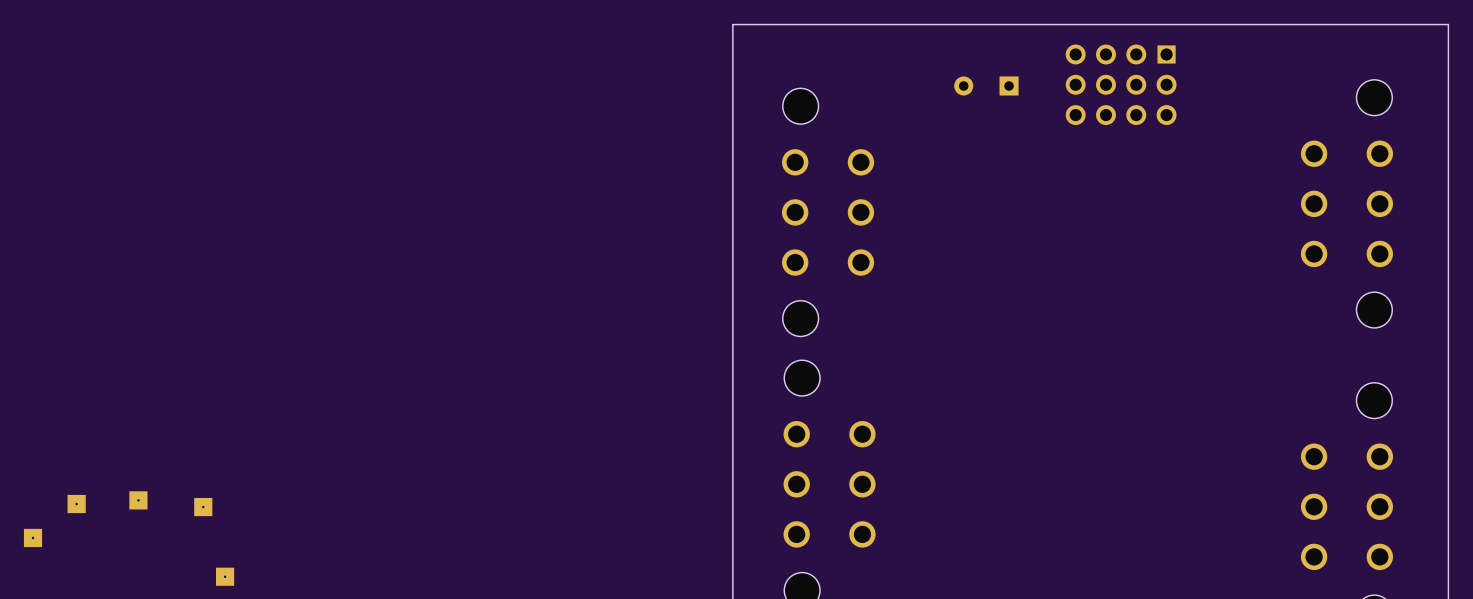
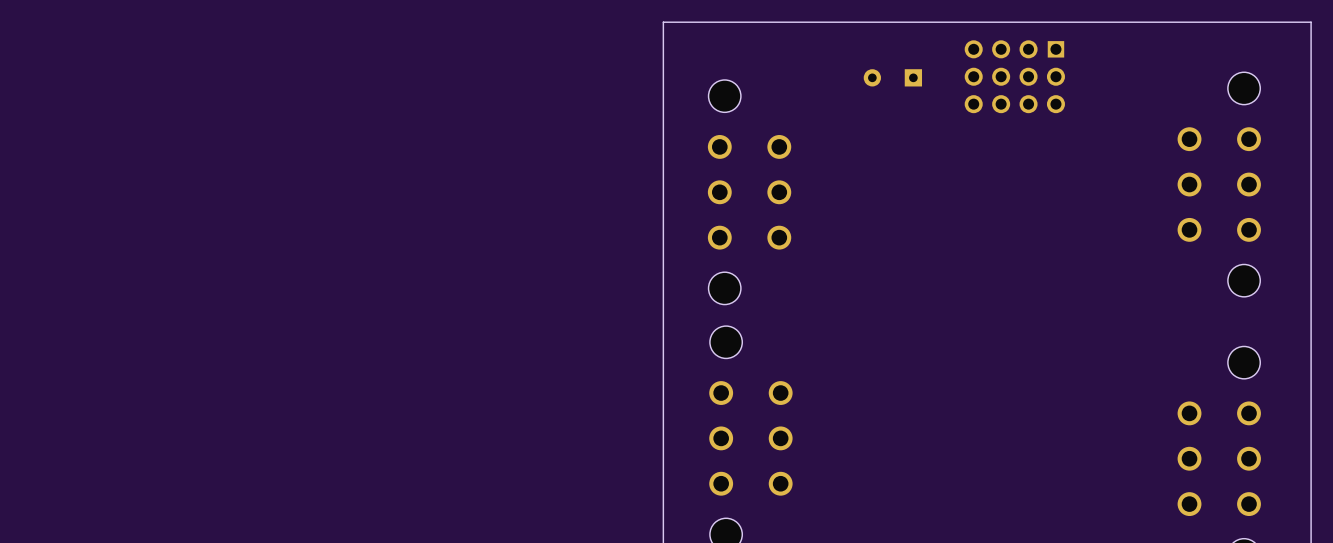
part: (138, 500) -> none
part: (76, 504) -> none
part: (203, 507) -> none
part: (33, 537) -> none
part: (225, 576) -> none

